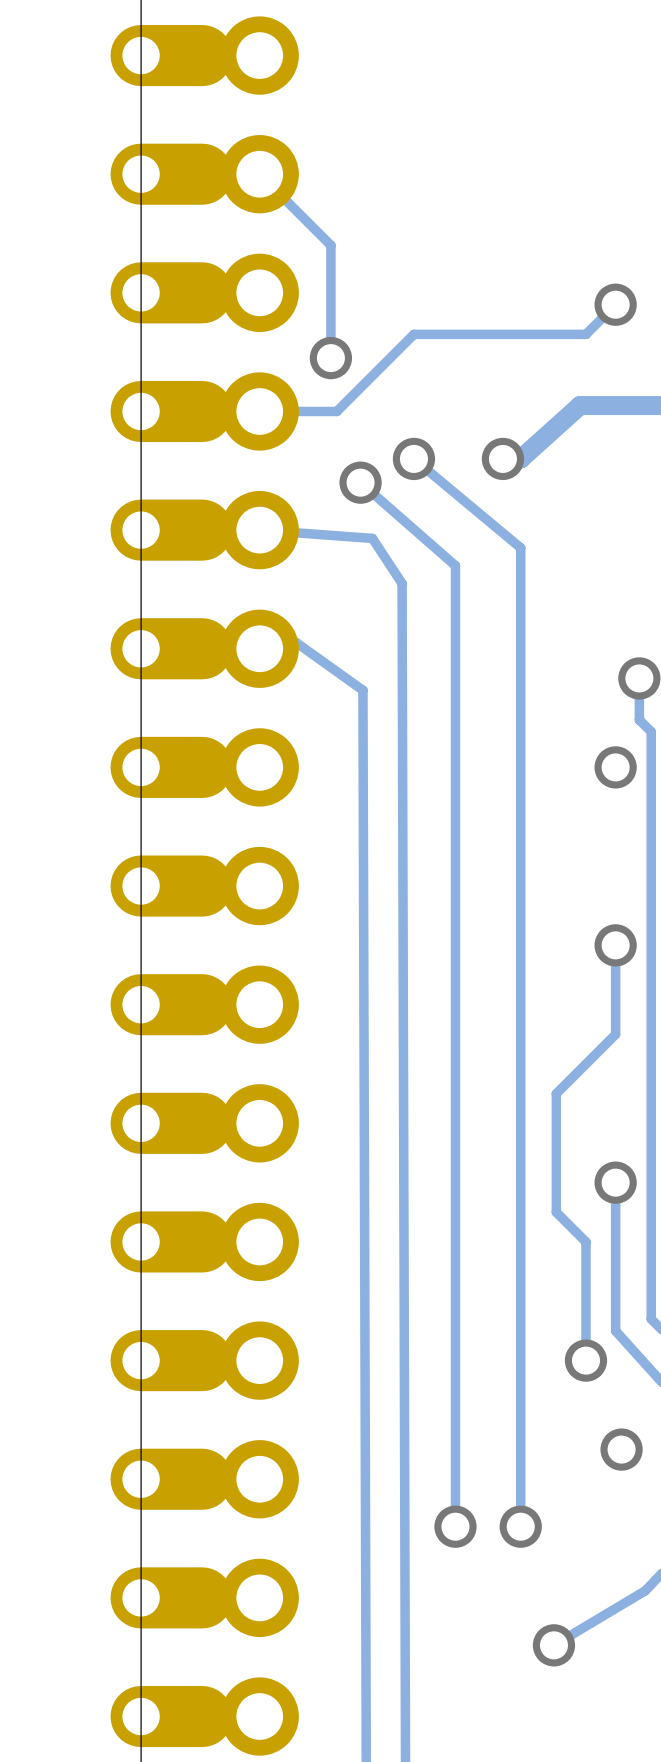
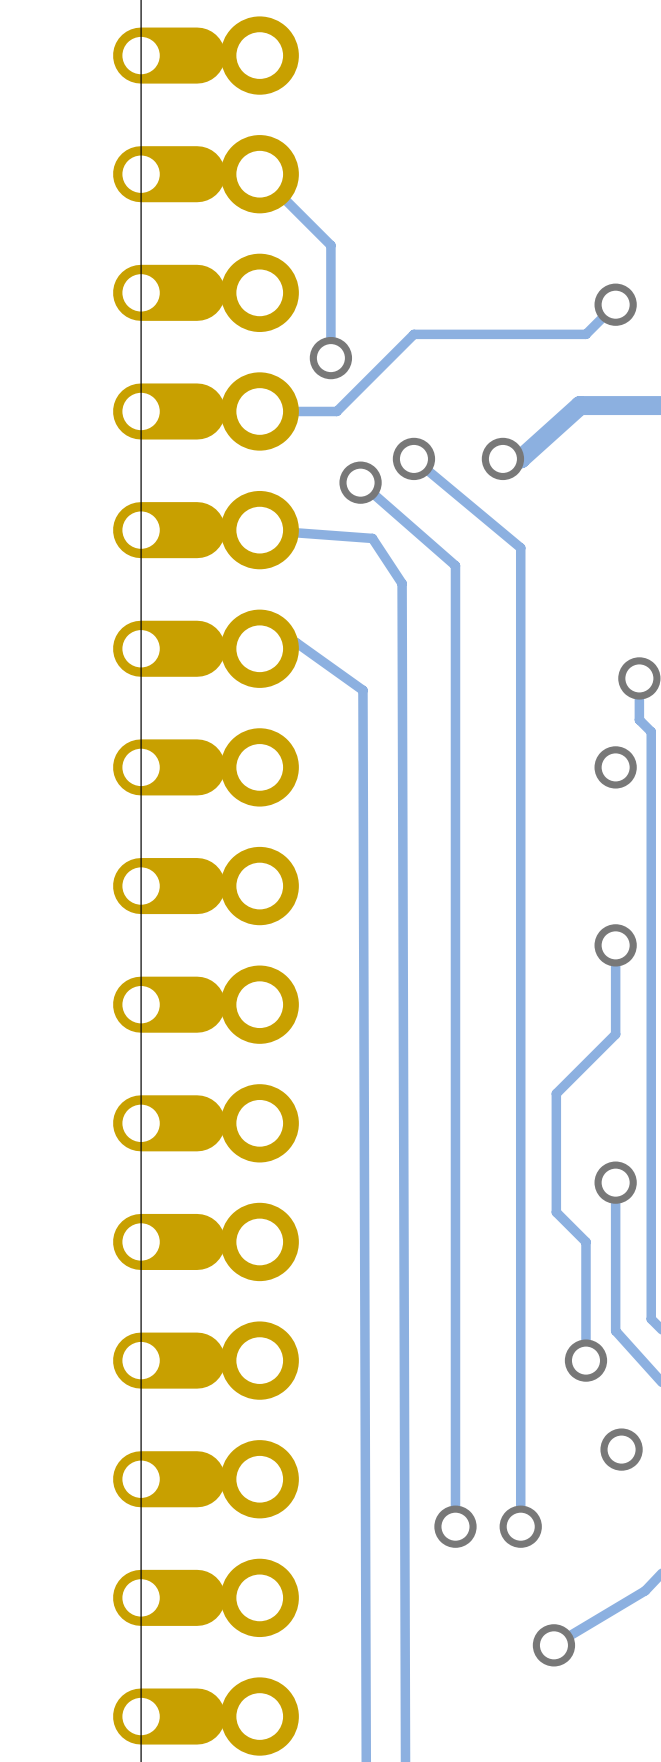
part footprint: [110, 25, 233, 1748] -> [113, 27, 226, 1745]

